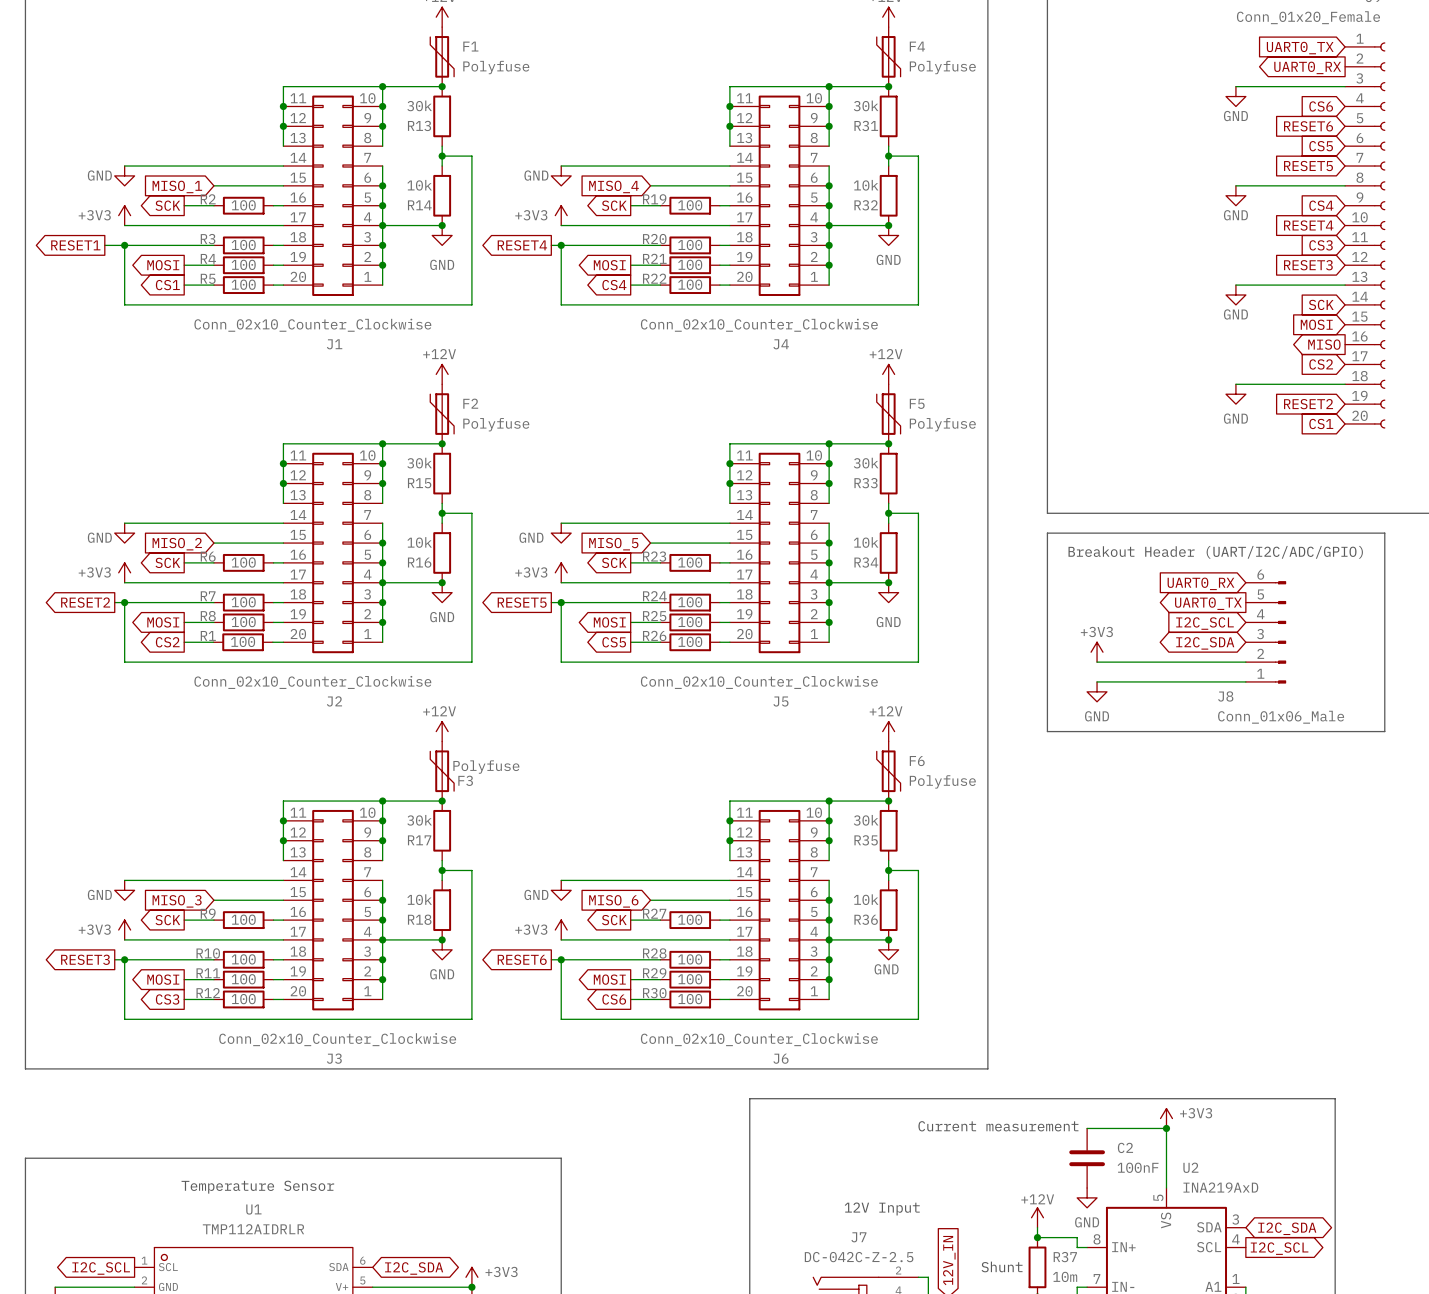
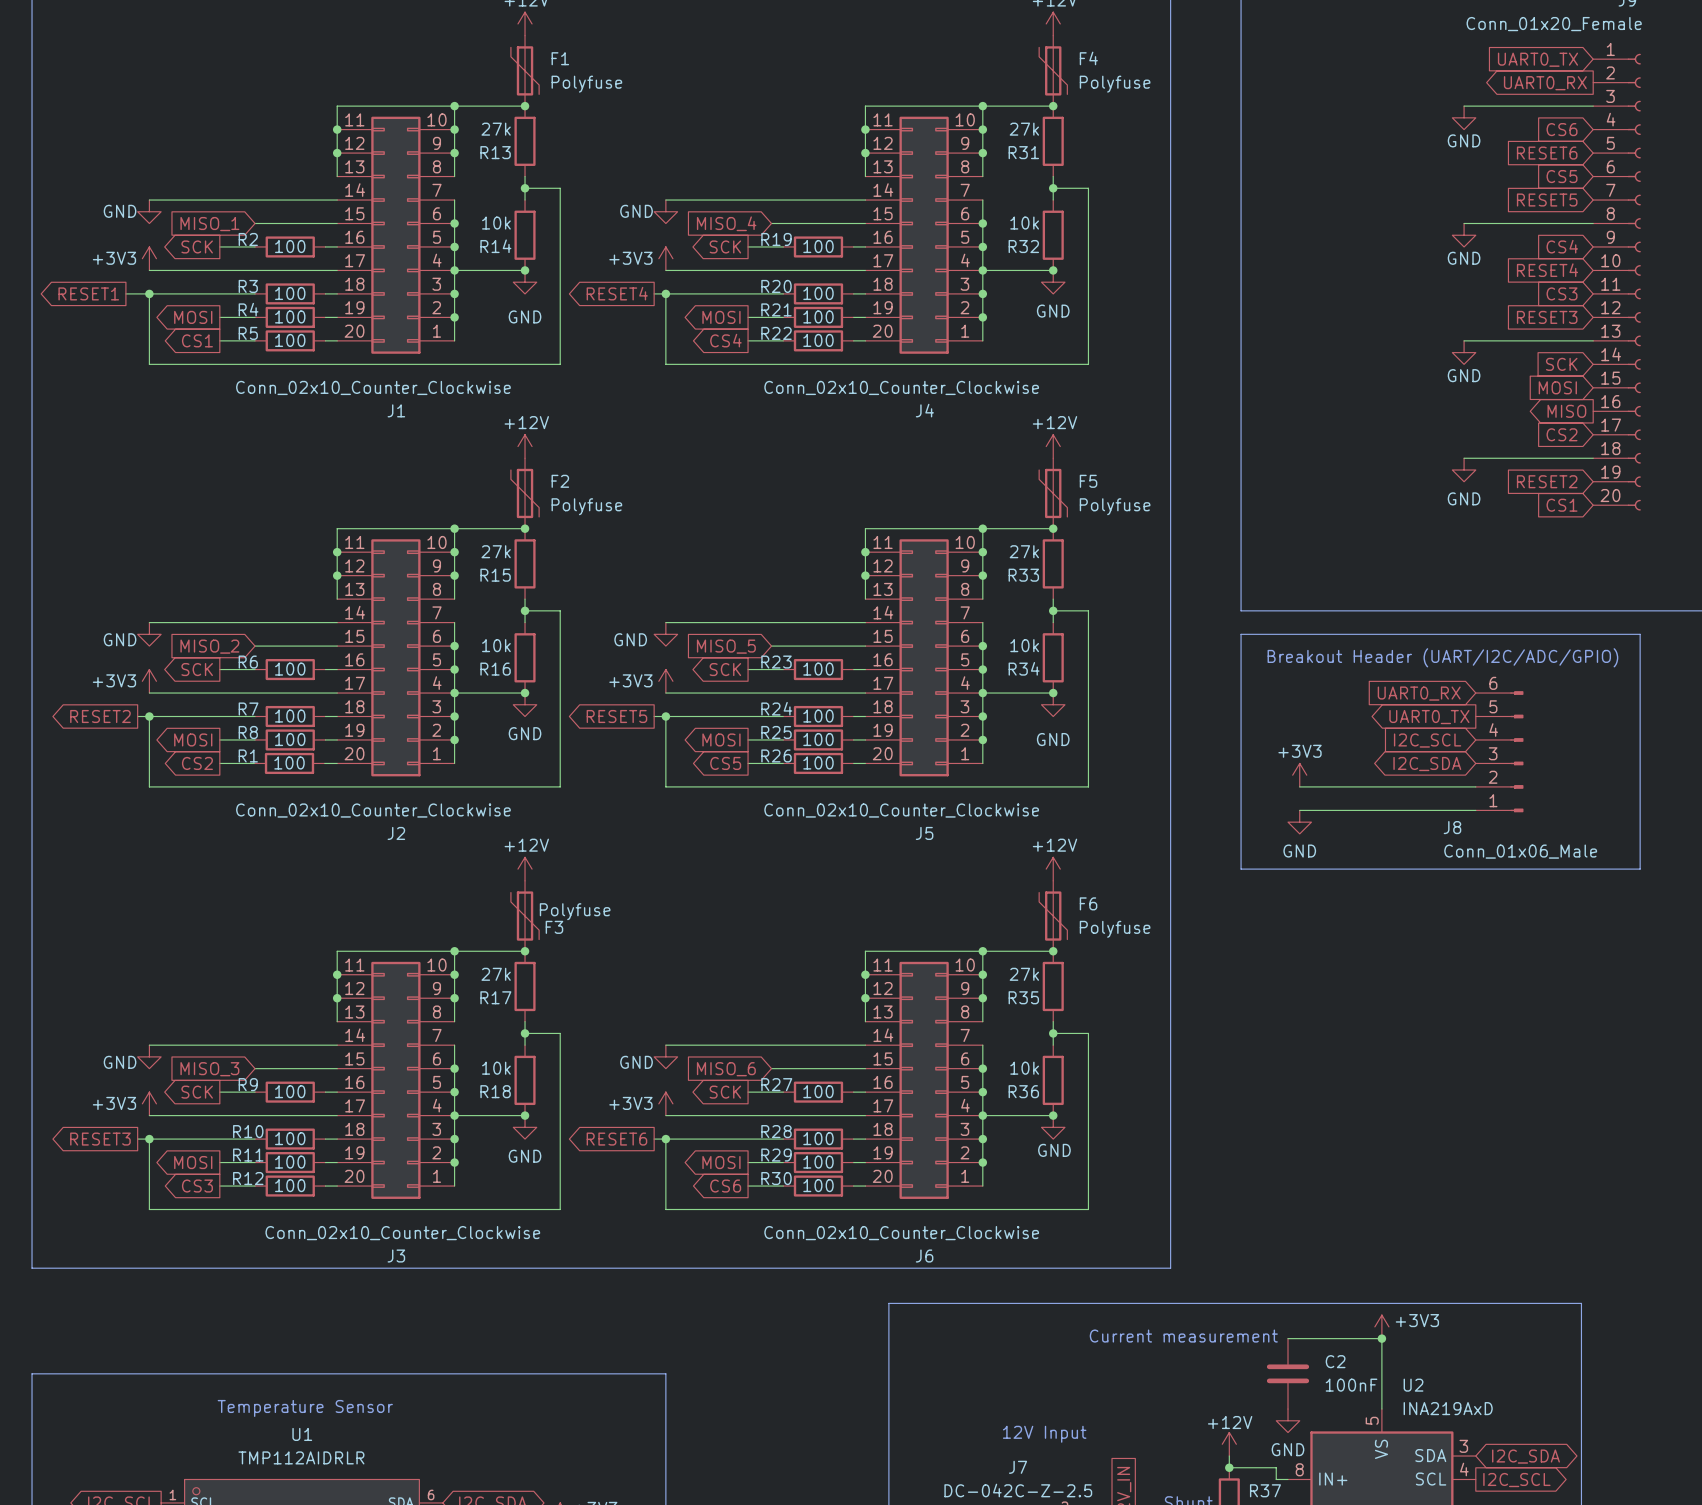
R13 value: 30k (419, 105) -> 27k (496, 129)
R31 value: 30k (866, 105) -> 27k (1024, 129)
R15 value: 30k (419, 463) -> 27k (496, 551)
R33 value: 30k (866, 463) -> 27k (1024, 551)
R17 value: 30k (419, 820) -> 27k (496, 974)
R35 value: 30k (866, 820) -> 27k (1024, 974)

